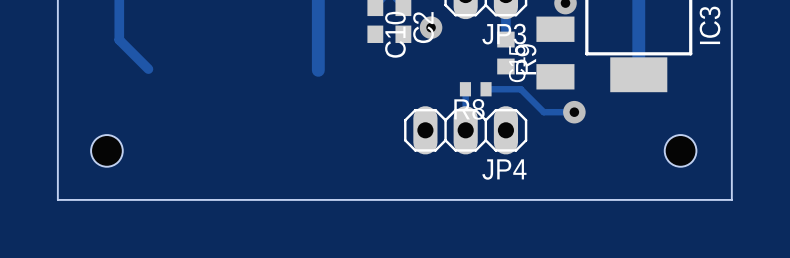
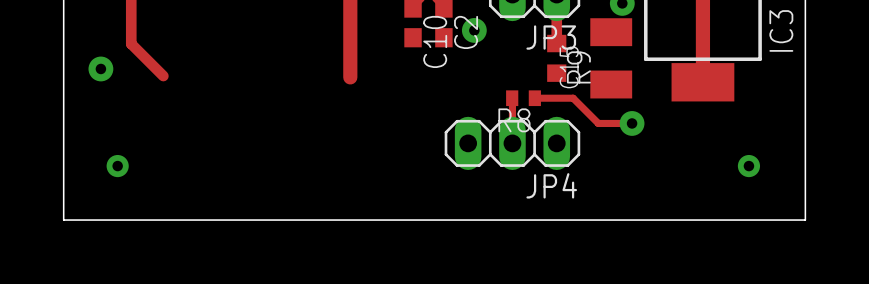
via: none -> (100, 68)
hole: (106, 150) -> none
hole: (680, 150) -> none

